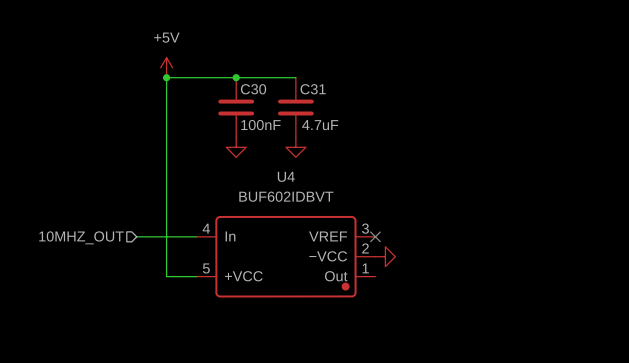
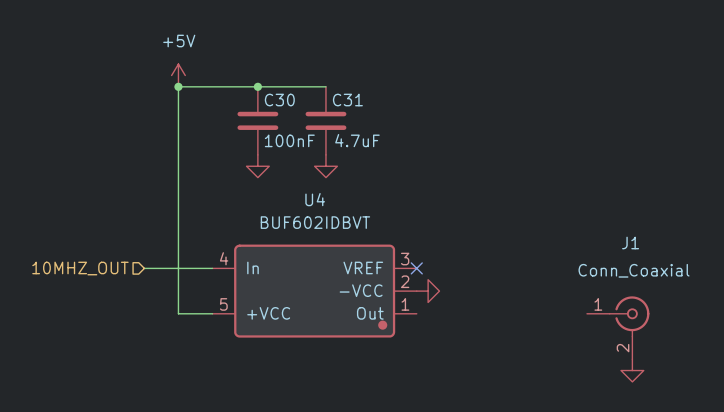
J1: none -> Conn_Coaxial (618, 327)
power symbol: none -> (632, 370)

